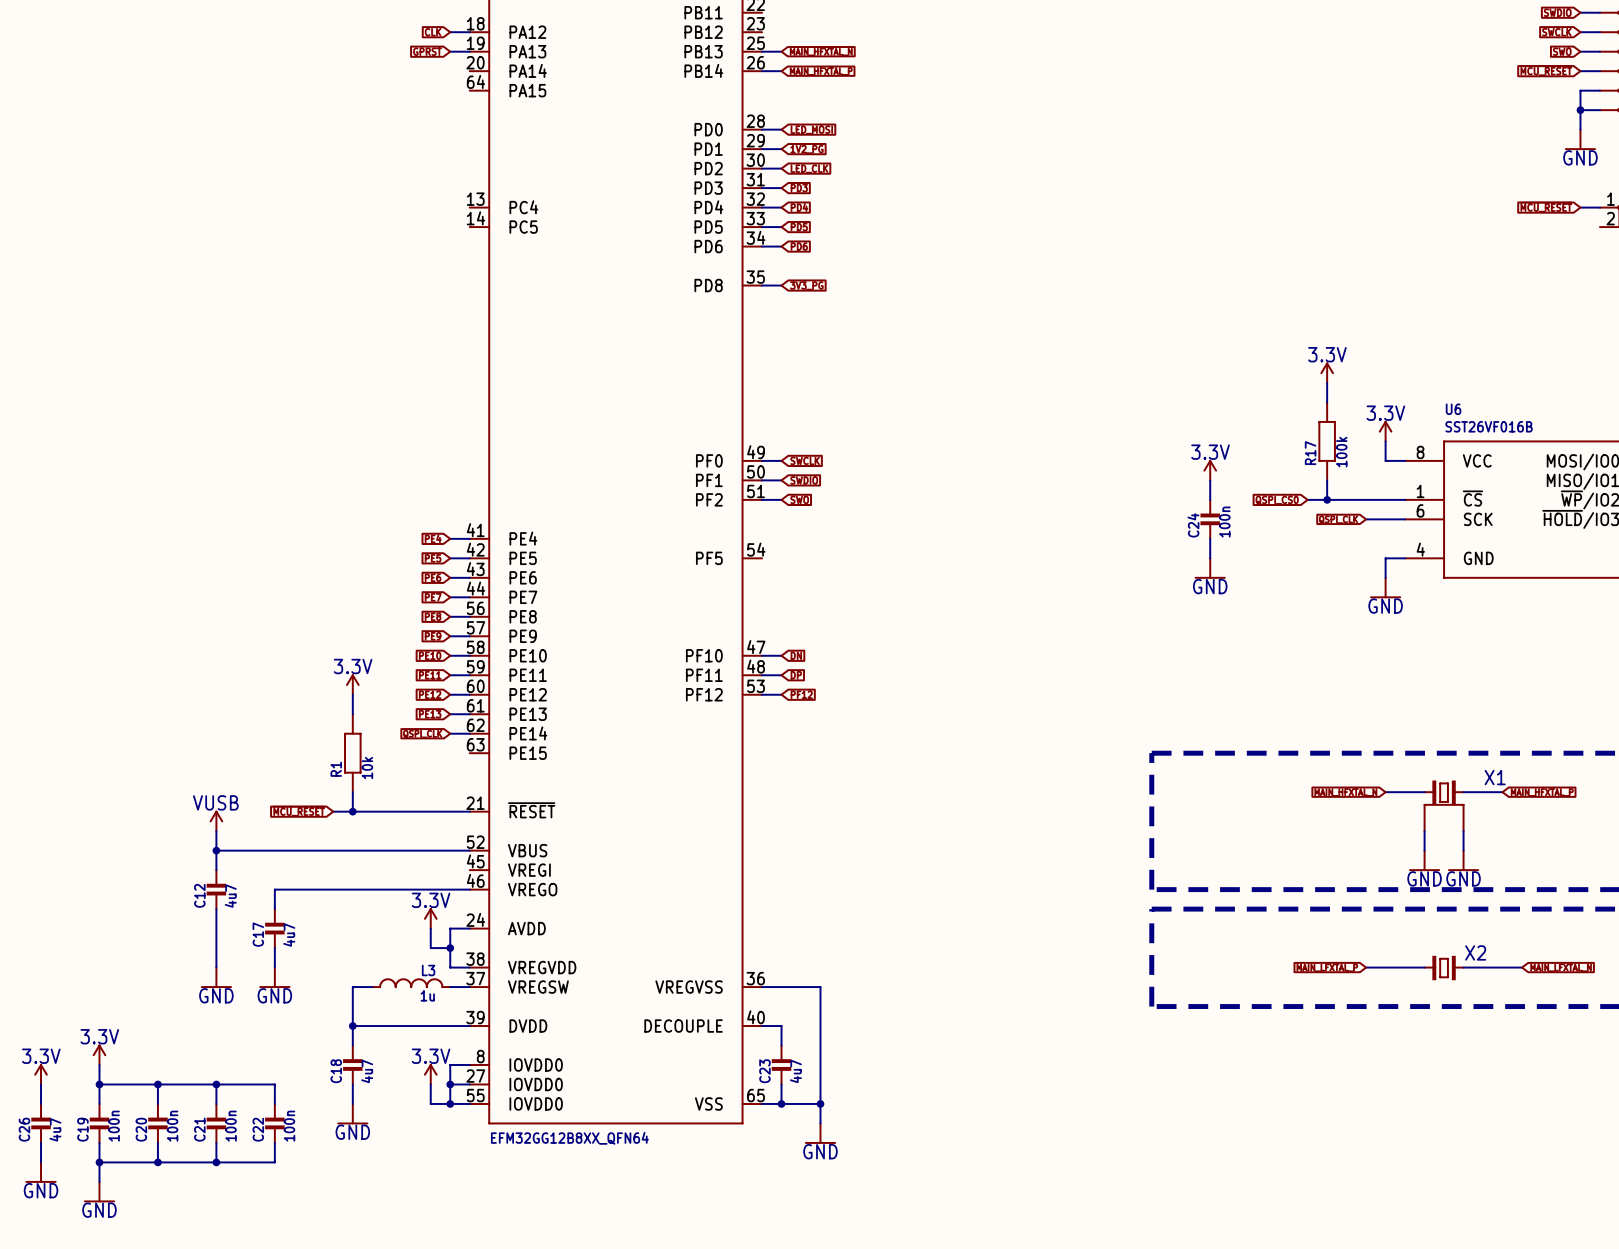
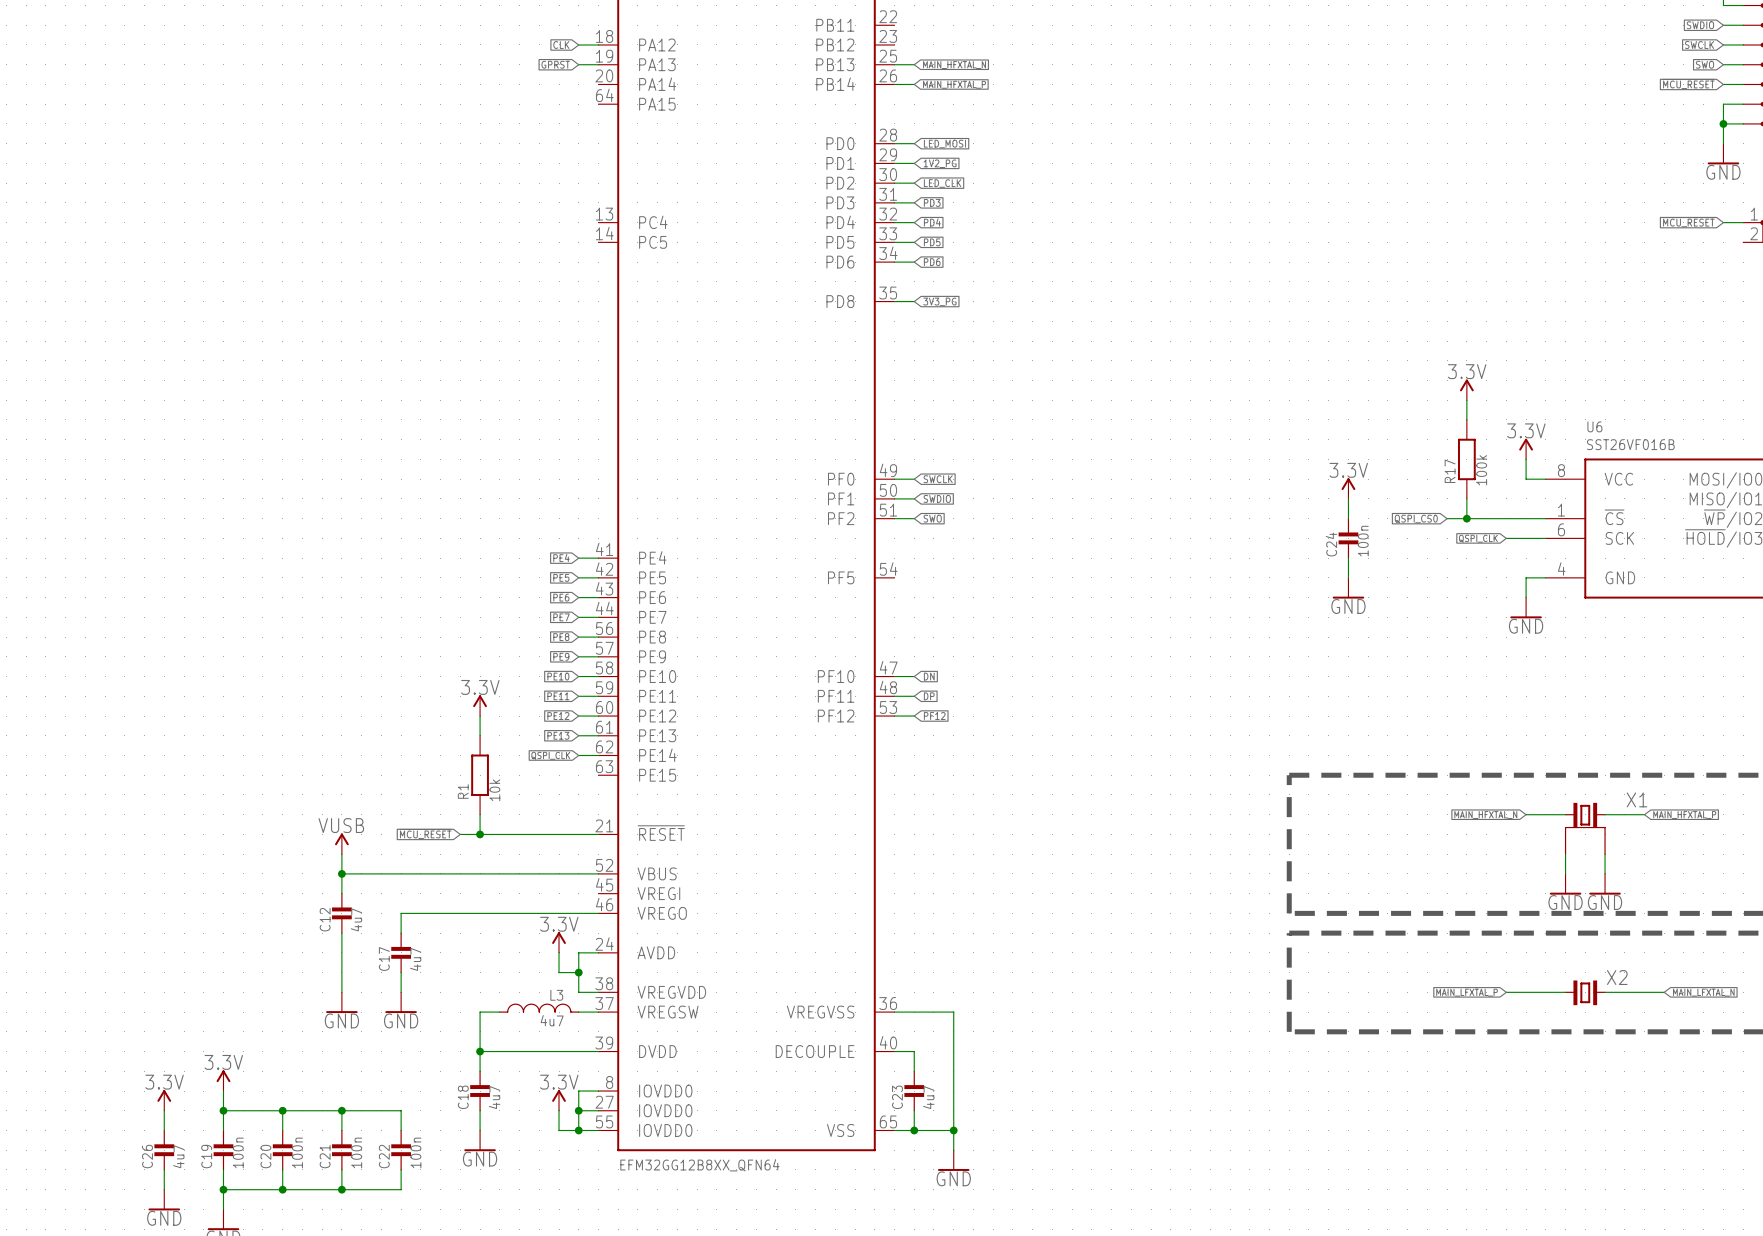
L3 value: 1u (427, 995) -> 4u7 (552, 1020)

